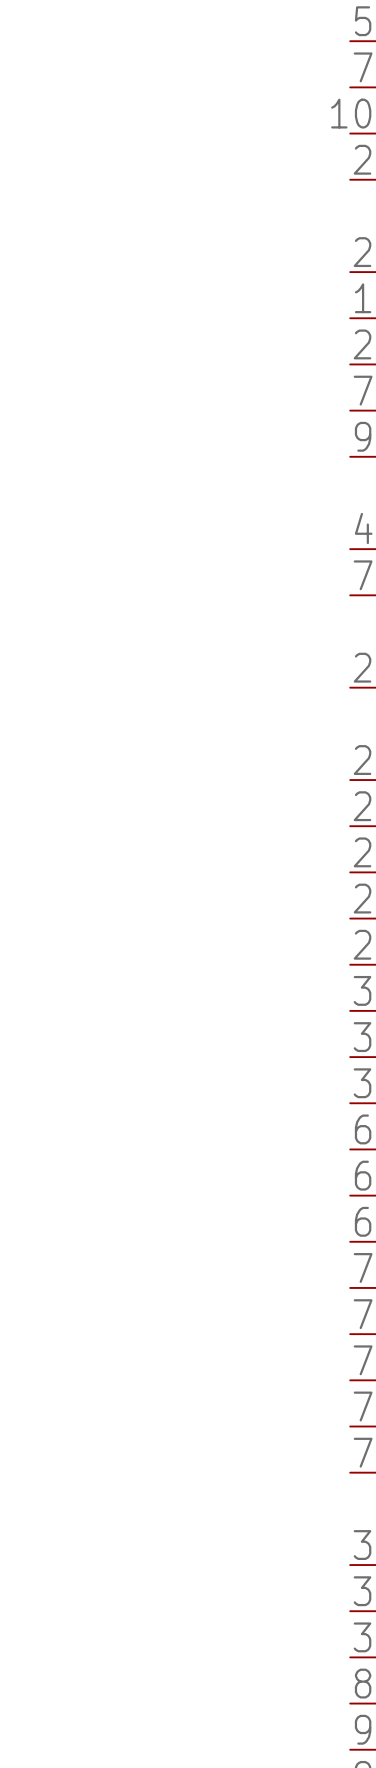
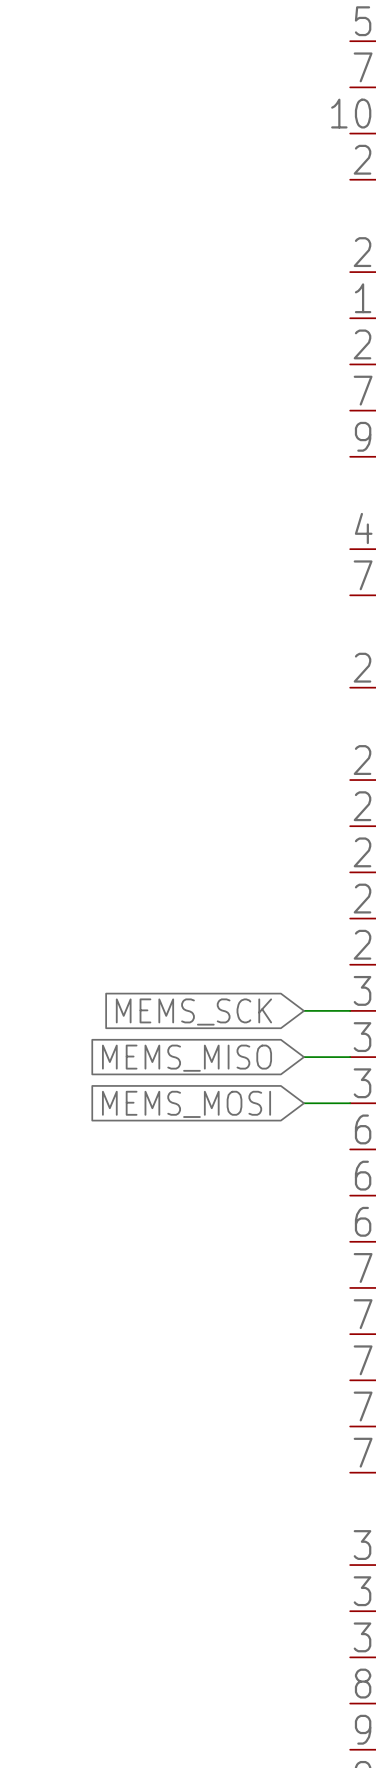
wire: none -> (304, 1010) (350, 1010)
global label: none -> MEMS_SCK (193, 1012)
wire: none -> (304, 1057) (350, 1057)
global label: none -> MEMS_MISO (187, 1058)
wire: none -> (304, 1103) (350, 1103)
global label: none -> MEMS_MOSI (186, 1104)

